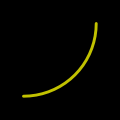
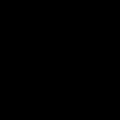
board edge: (96, 23) (95, 36) (89, 54) (74, 74) (54, 89) (36, 95) (23, 96) -> none

